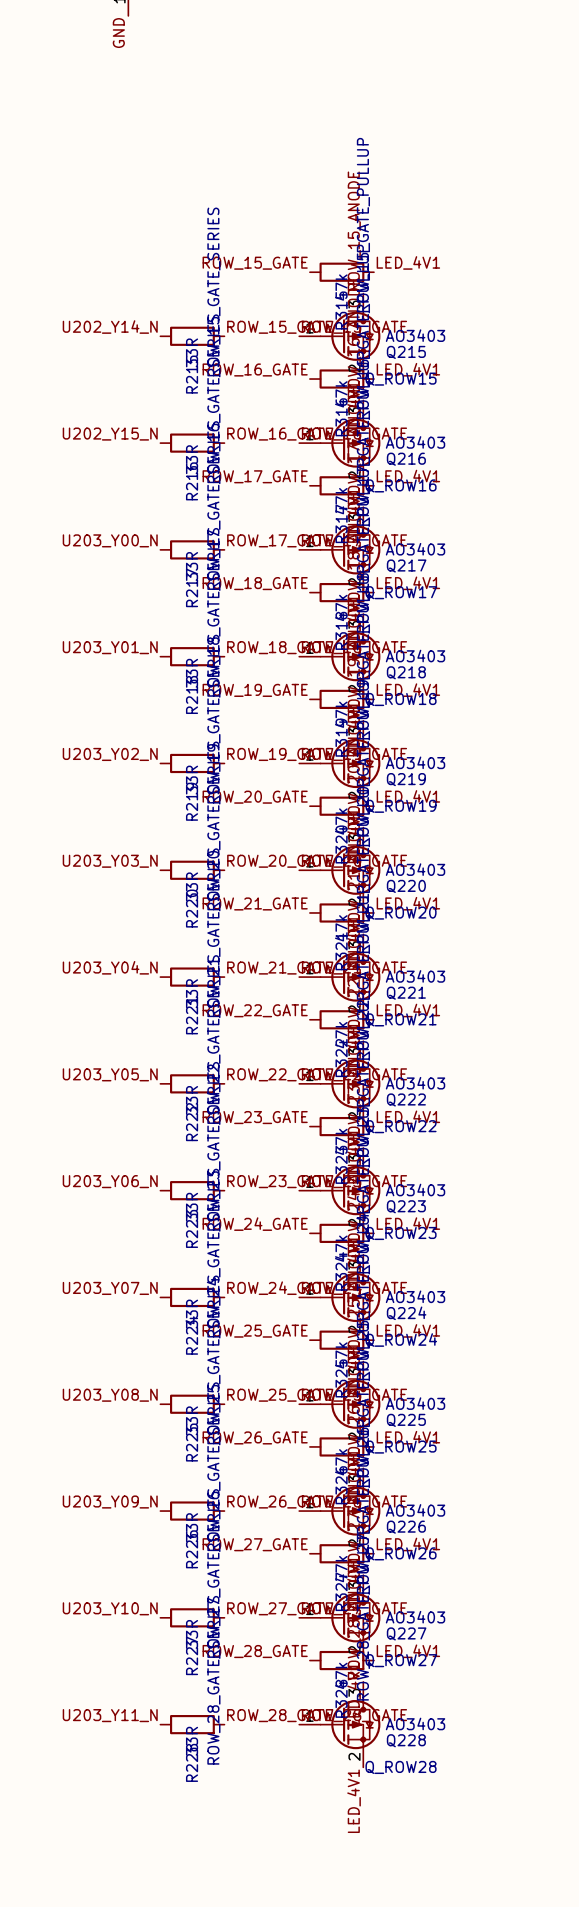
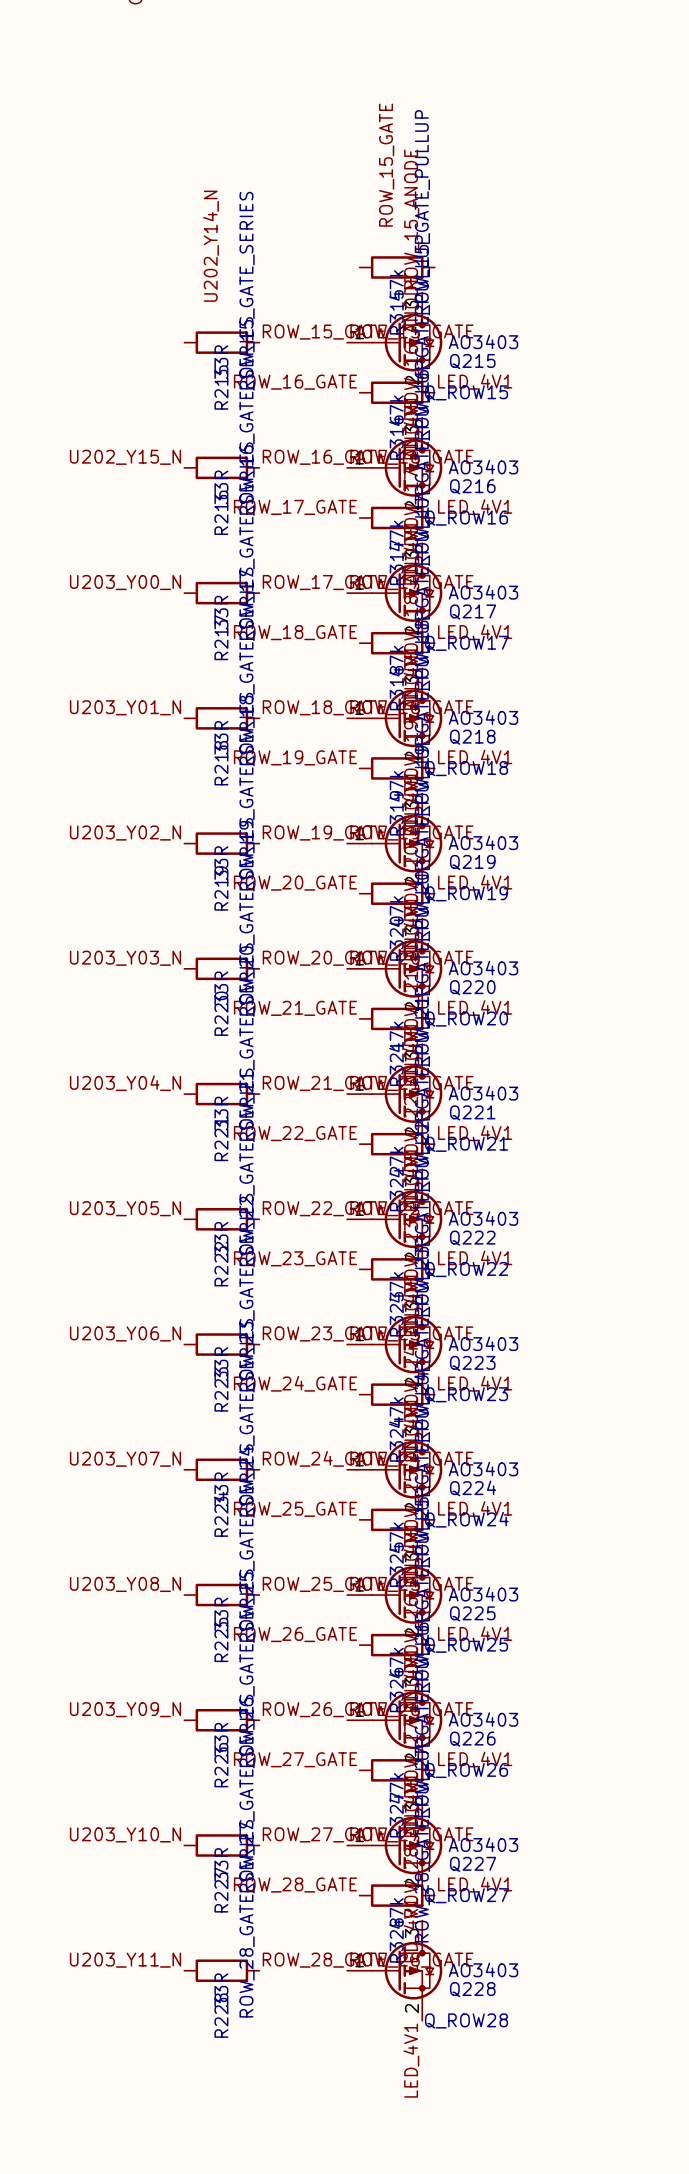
label: LED_4V1 (408, 262) -> none
label rotation: 0° (255, 263) -> 90° counterclockwise (386, 165)
label rotation: 0° (110, 327) -> 90° counterclockwise (211, 246)
label position: U202_Y14_N (110, 327) -> U202_Y14_N (211, 246)

